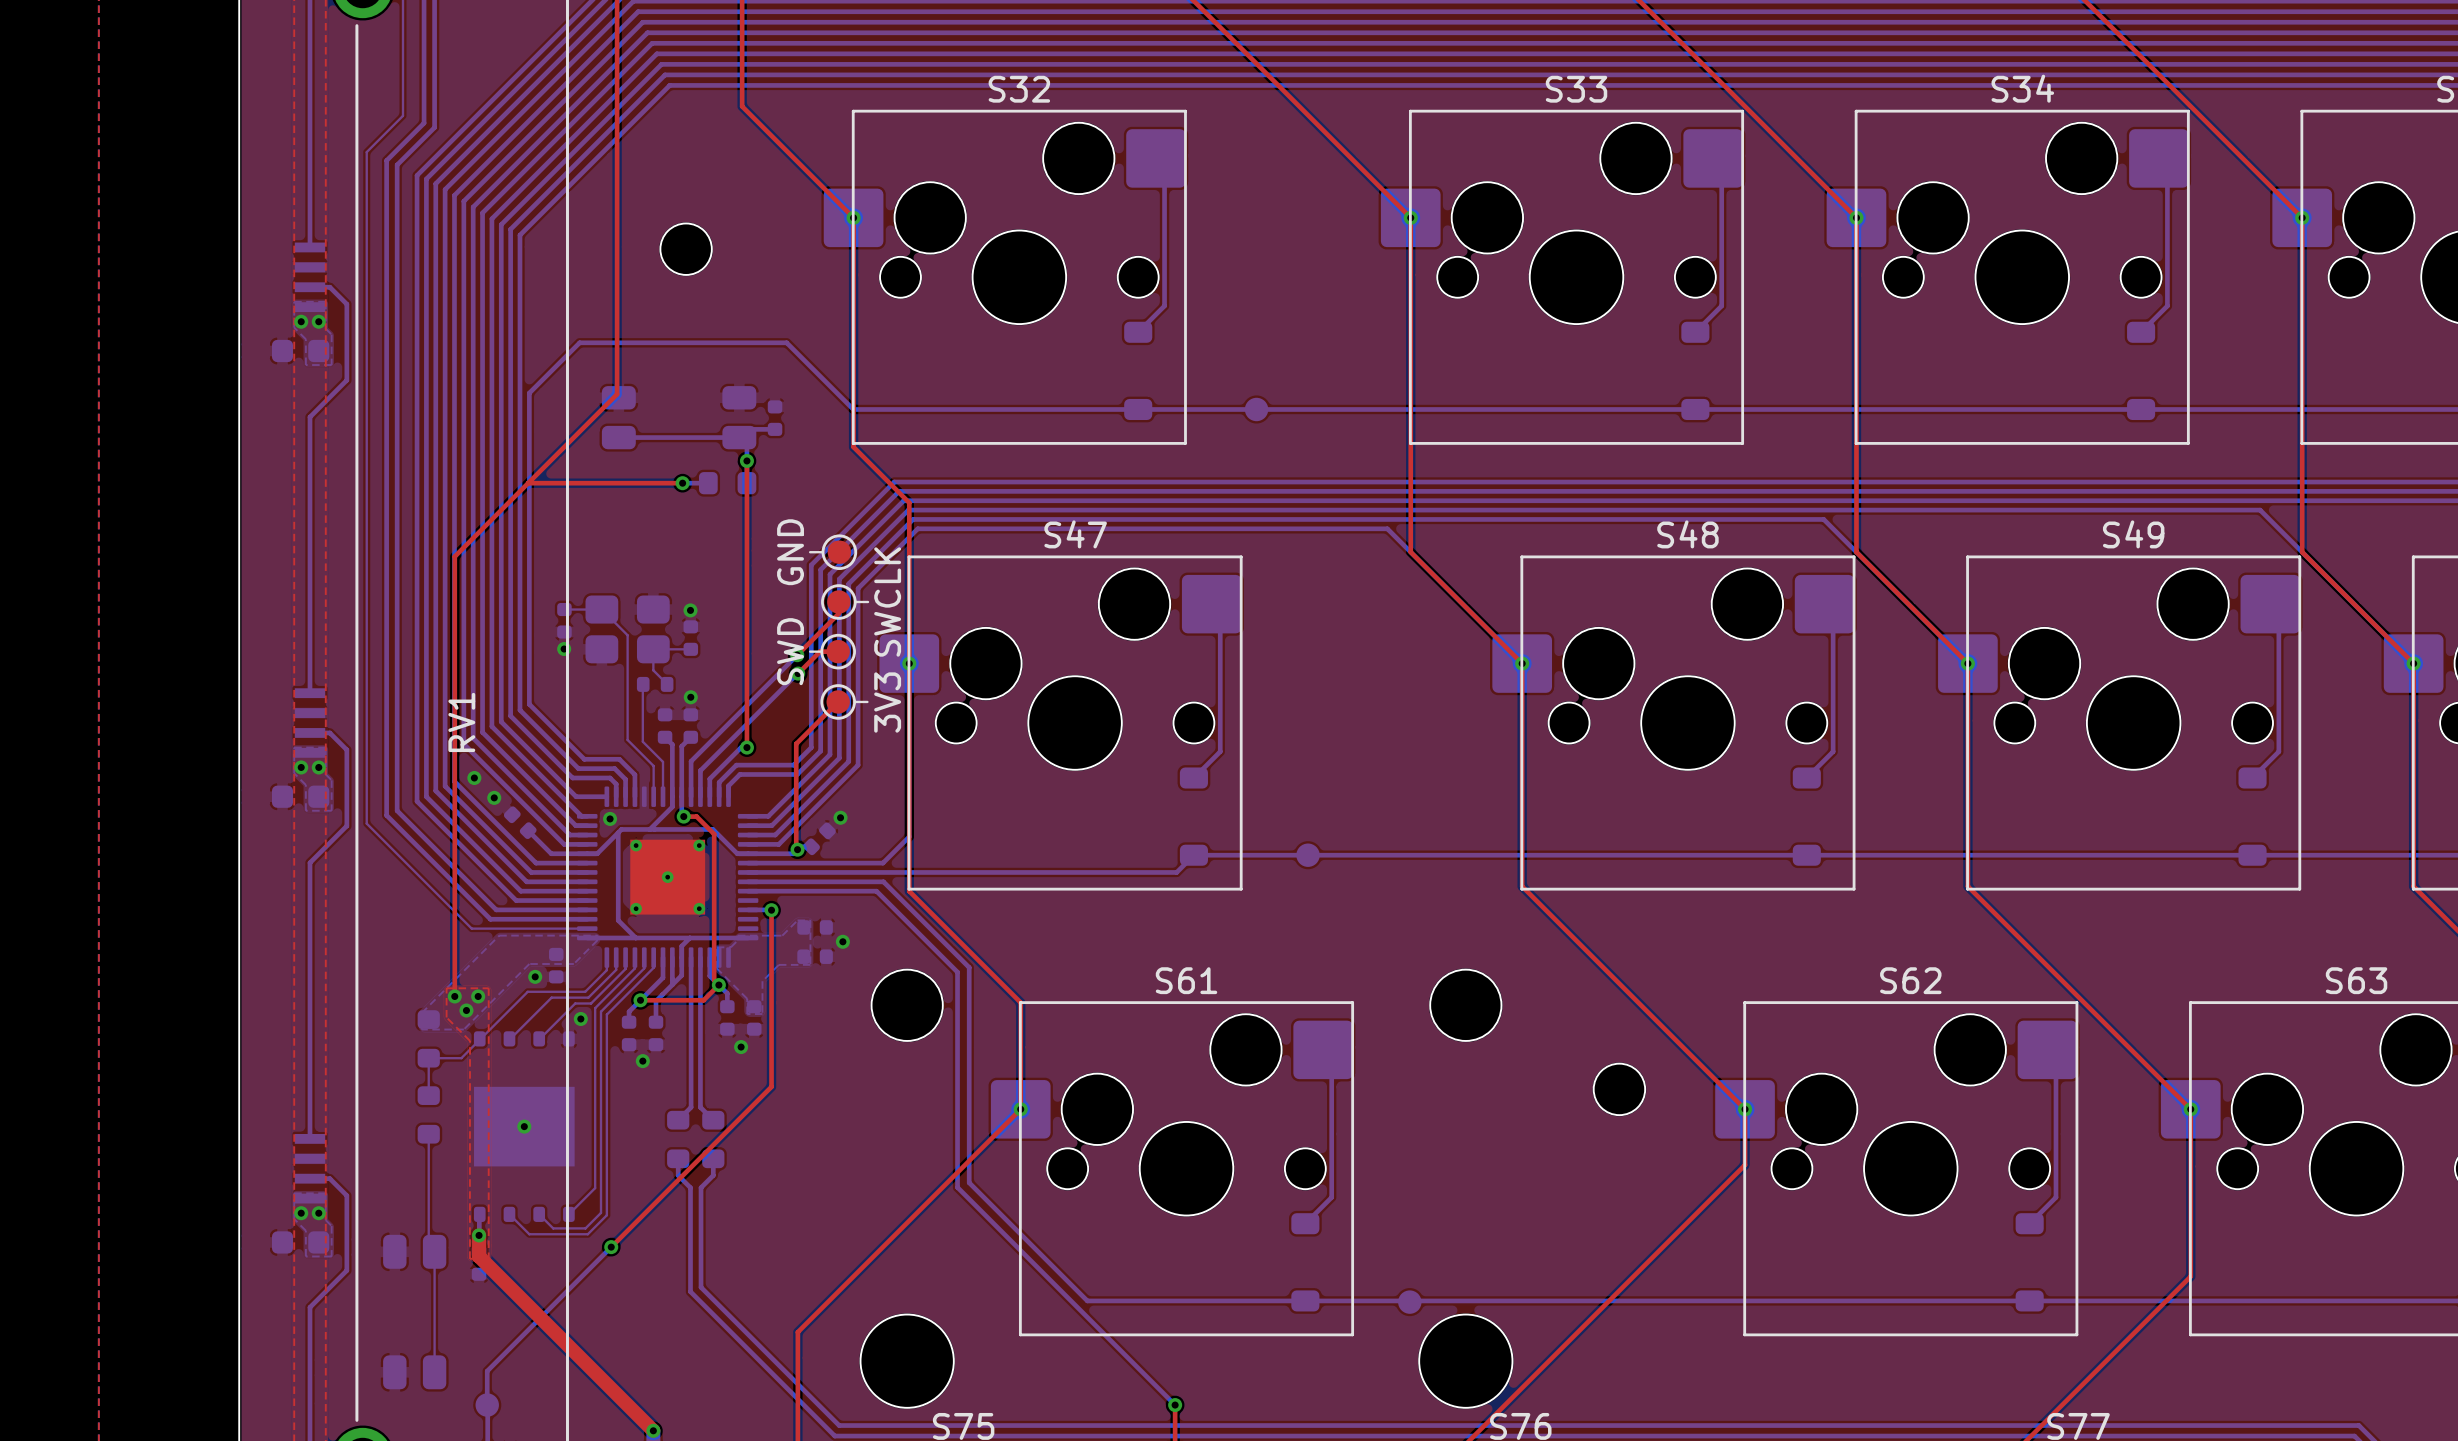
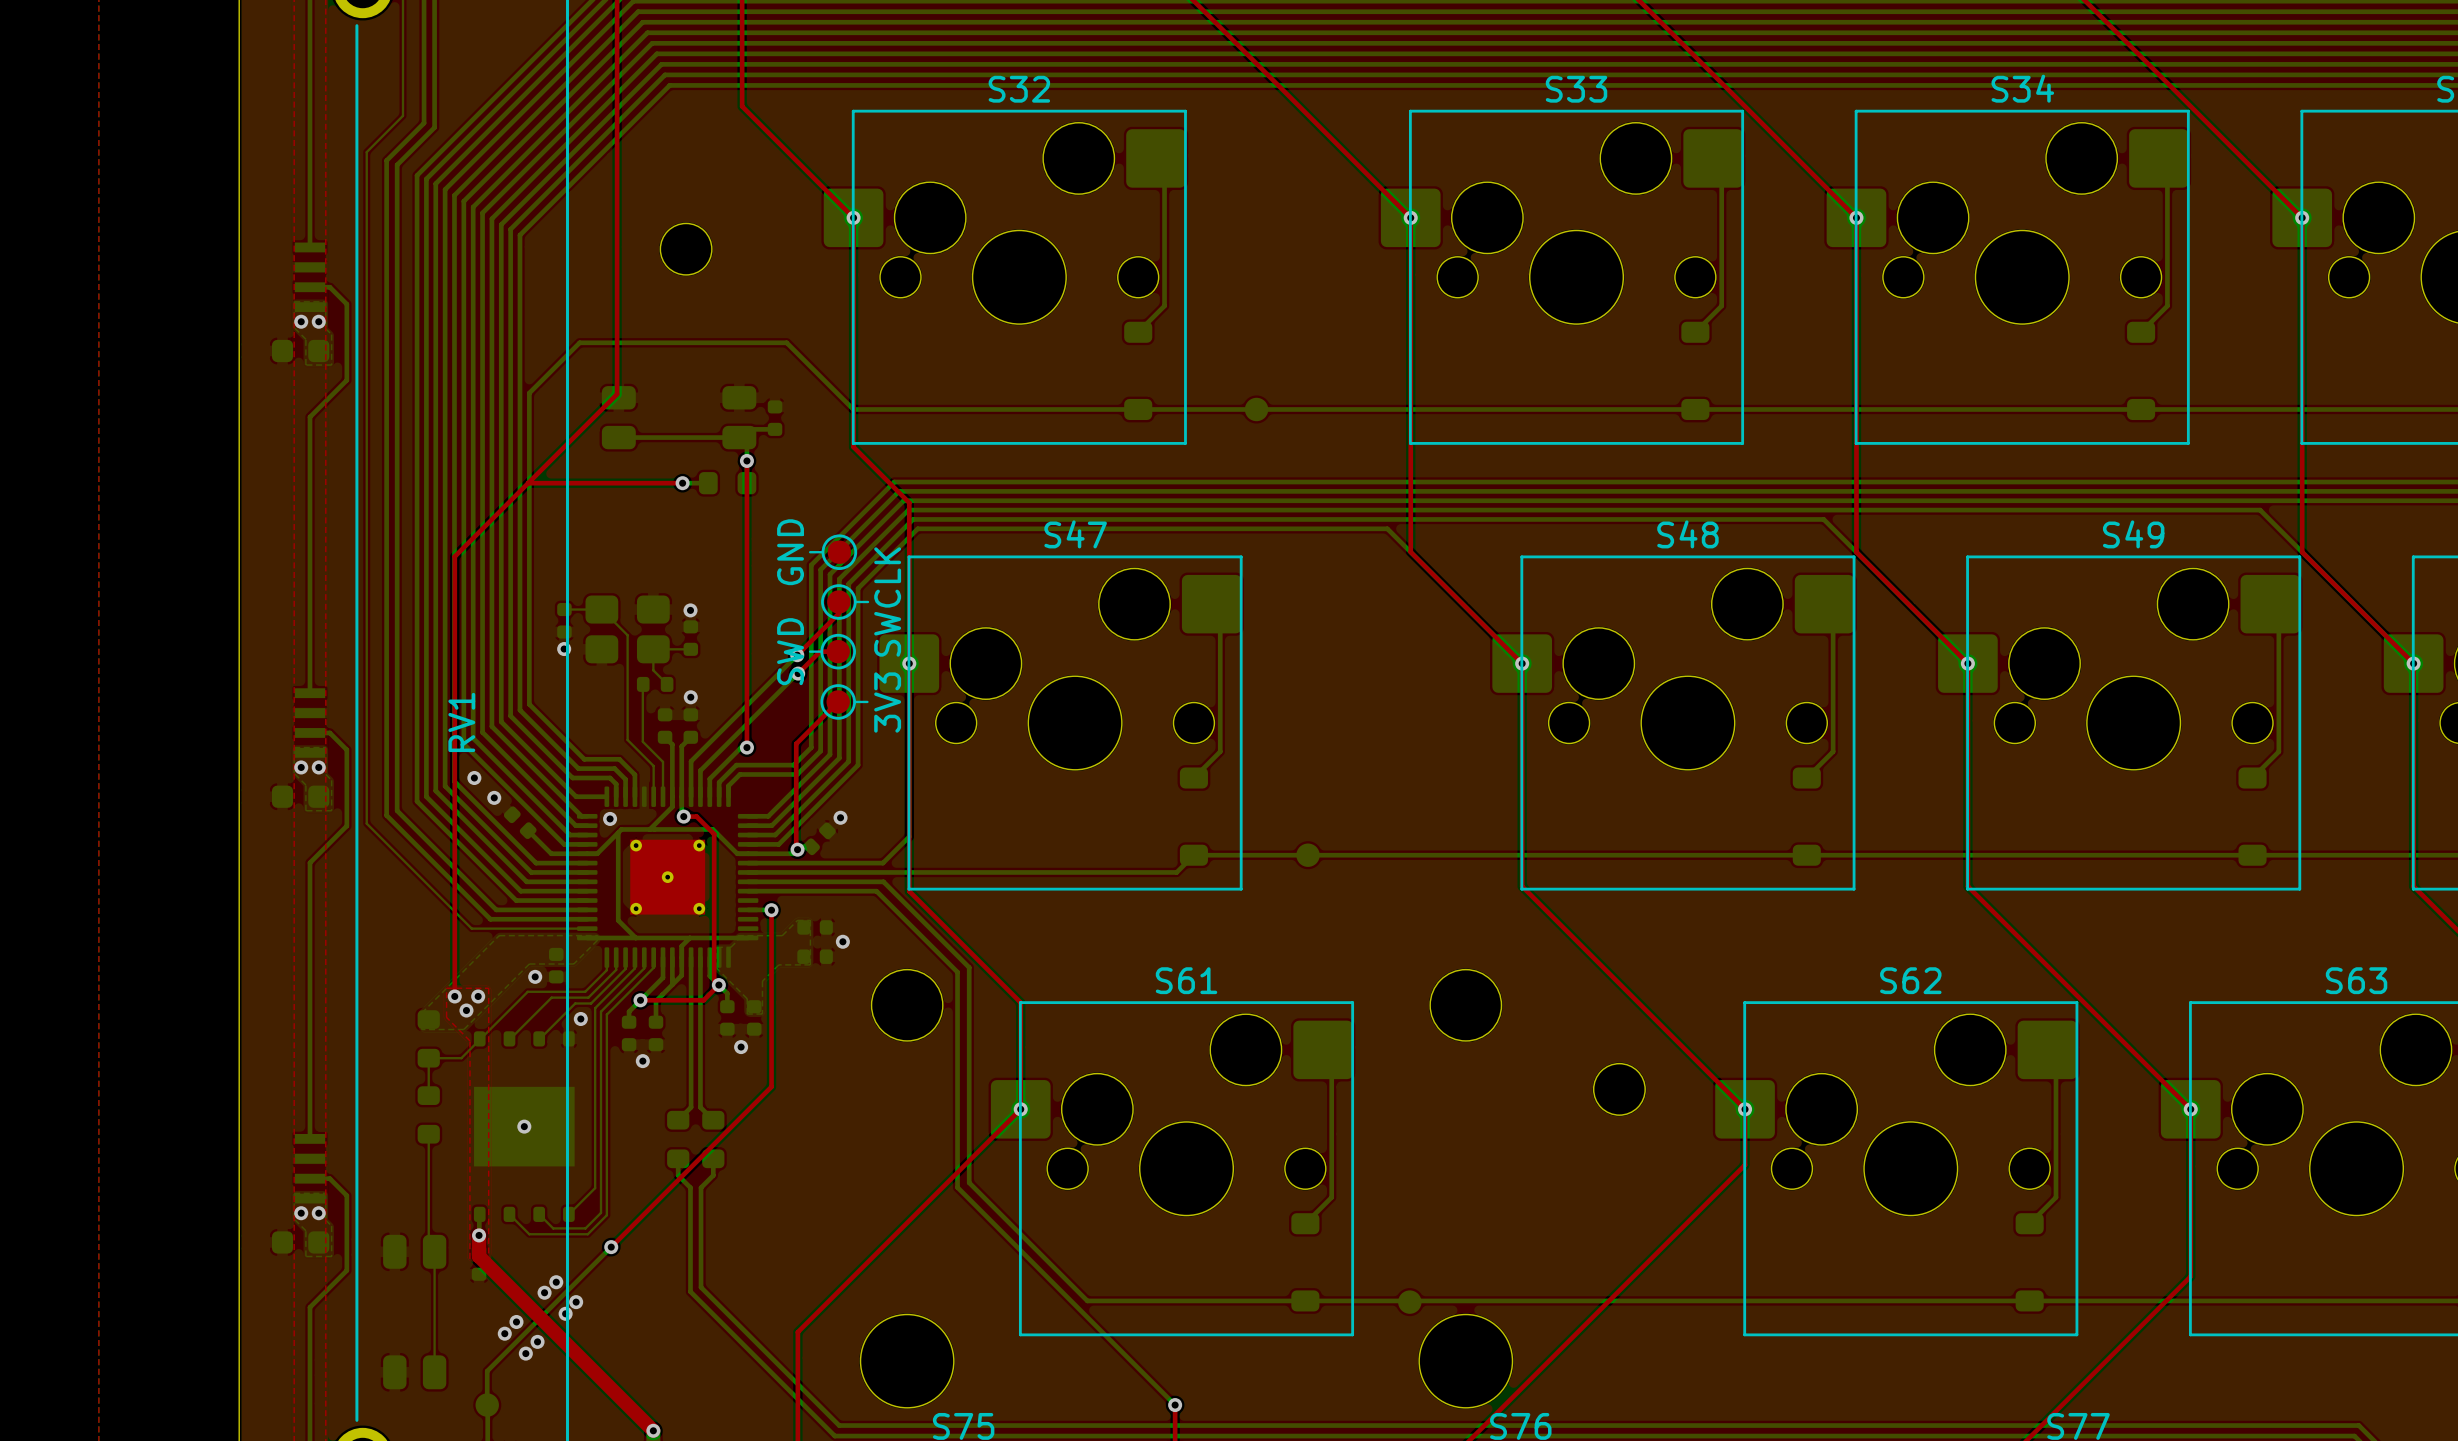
via: none -> (556, 1282)
via: none -> (544, 1292)
via: none -> (576, 1302)
via: none -> (565, 1313)
via: none -> (516, 1321)
via: none -> (504, 1333)
via: none -> (537, 1341)
via: none -> (525, 1353)

